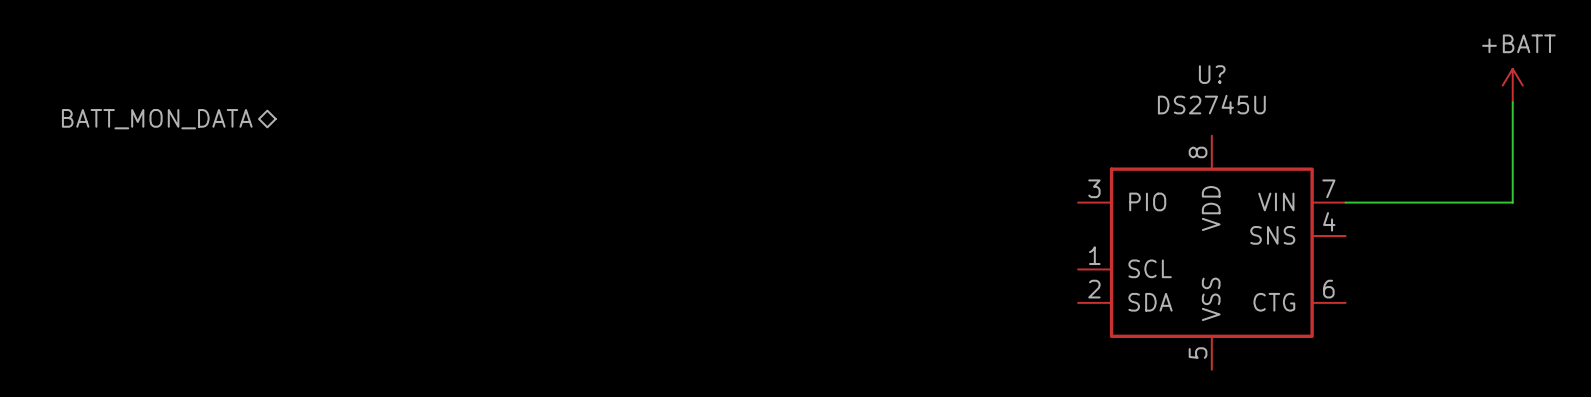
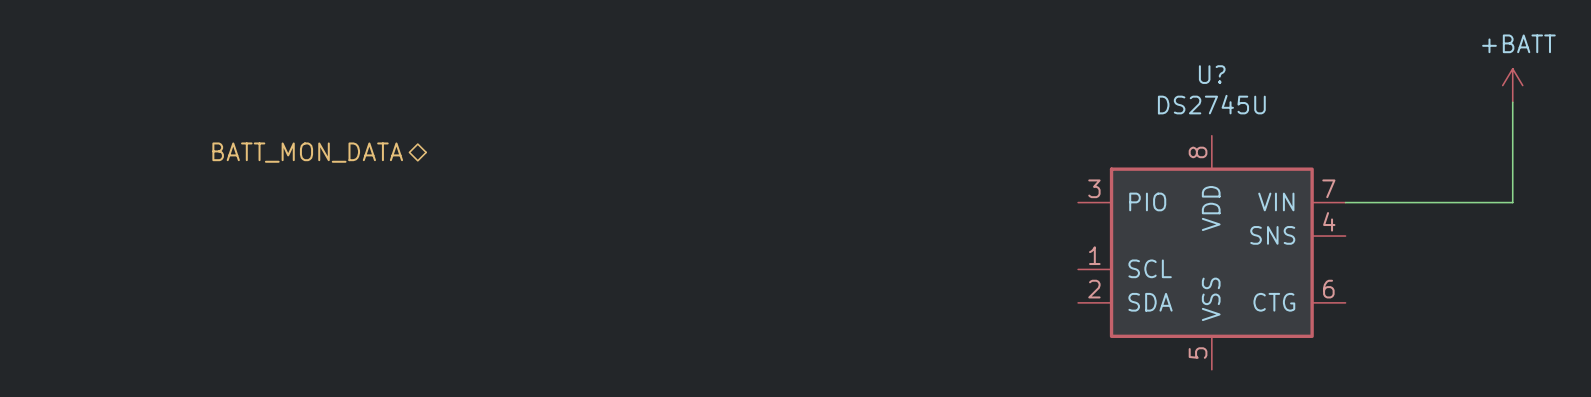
hierarchical label position: BATT_MON_DATA (157, 119) -> BATT_MON_DATA (307, 152)

